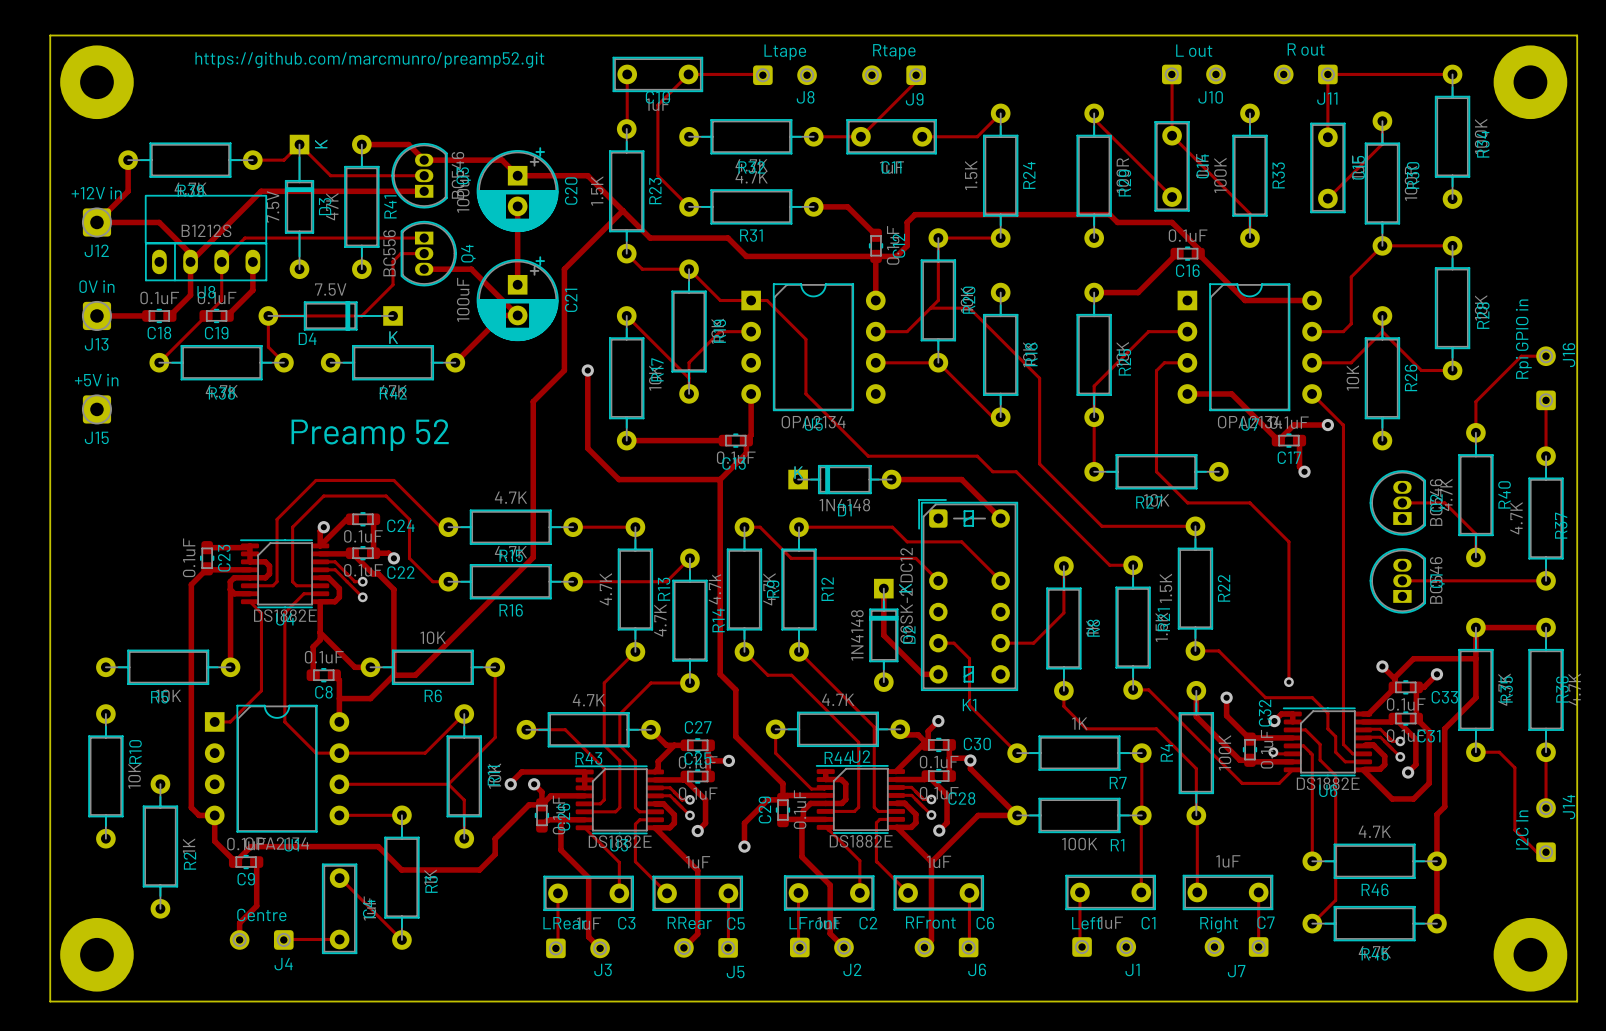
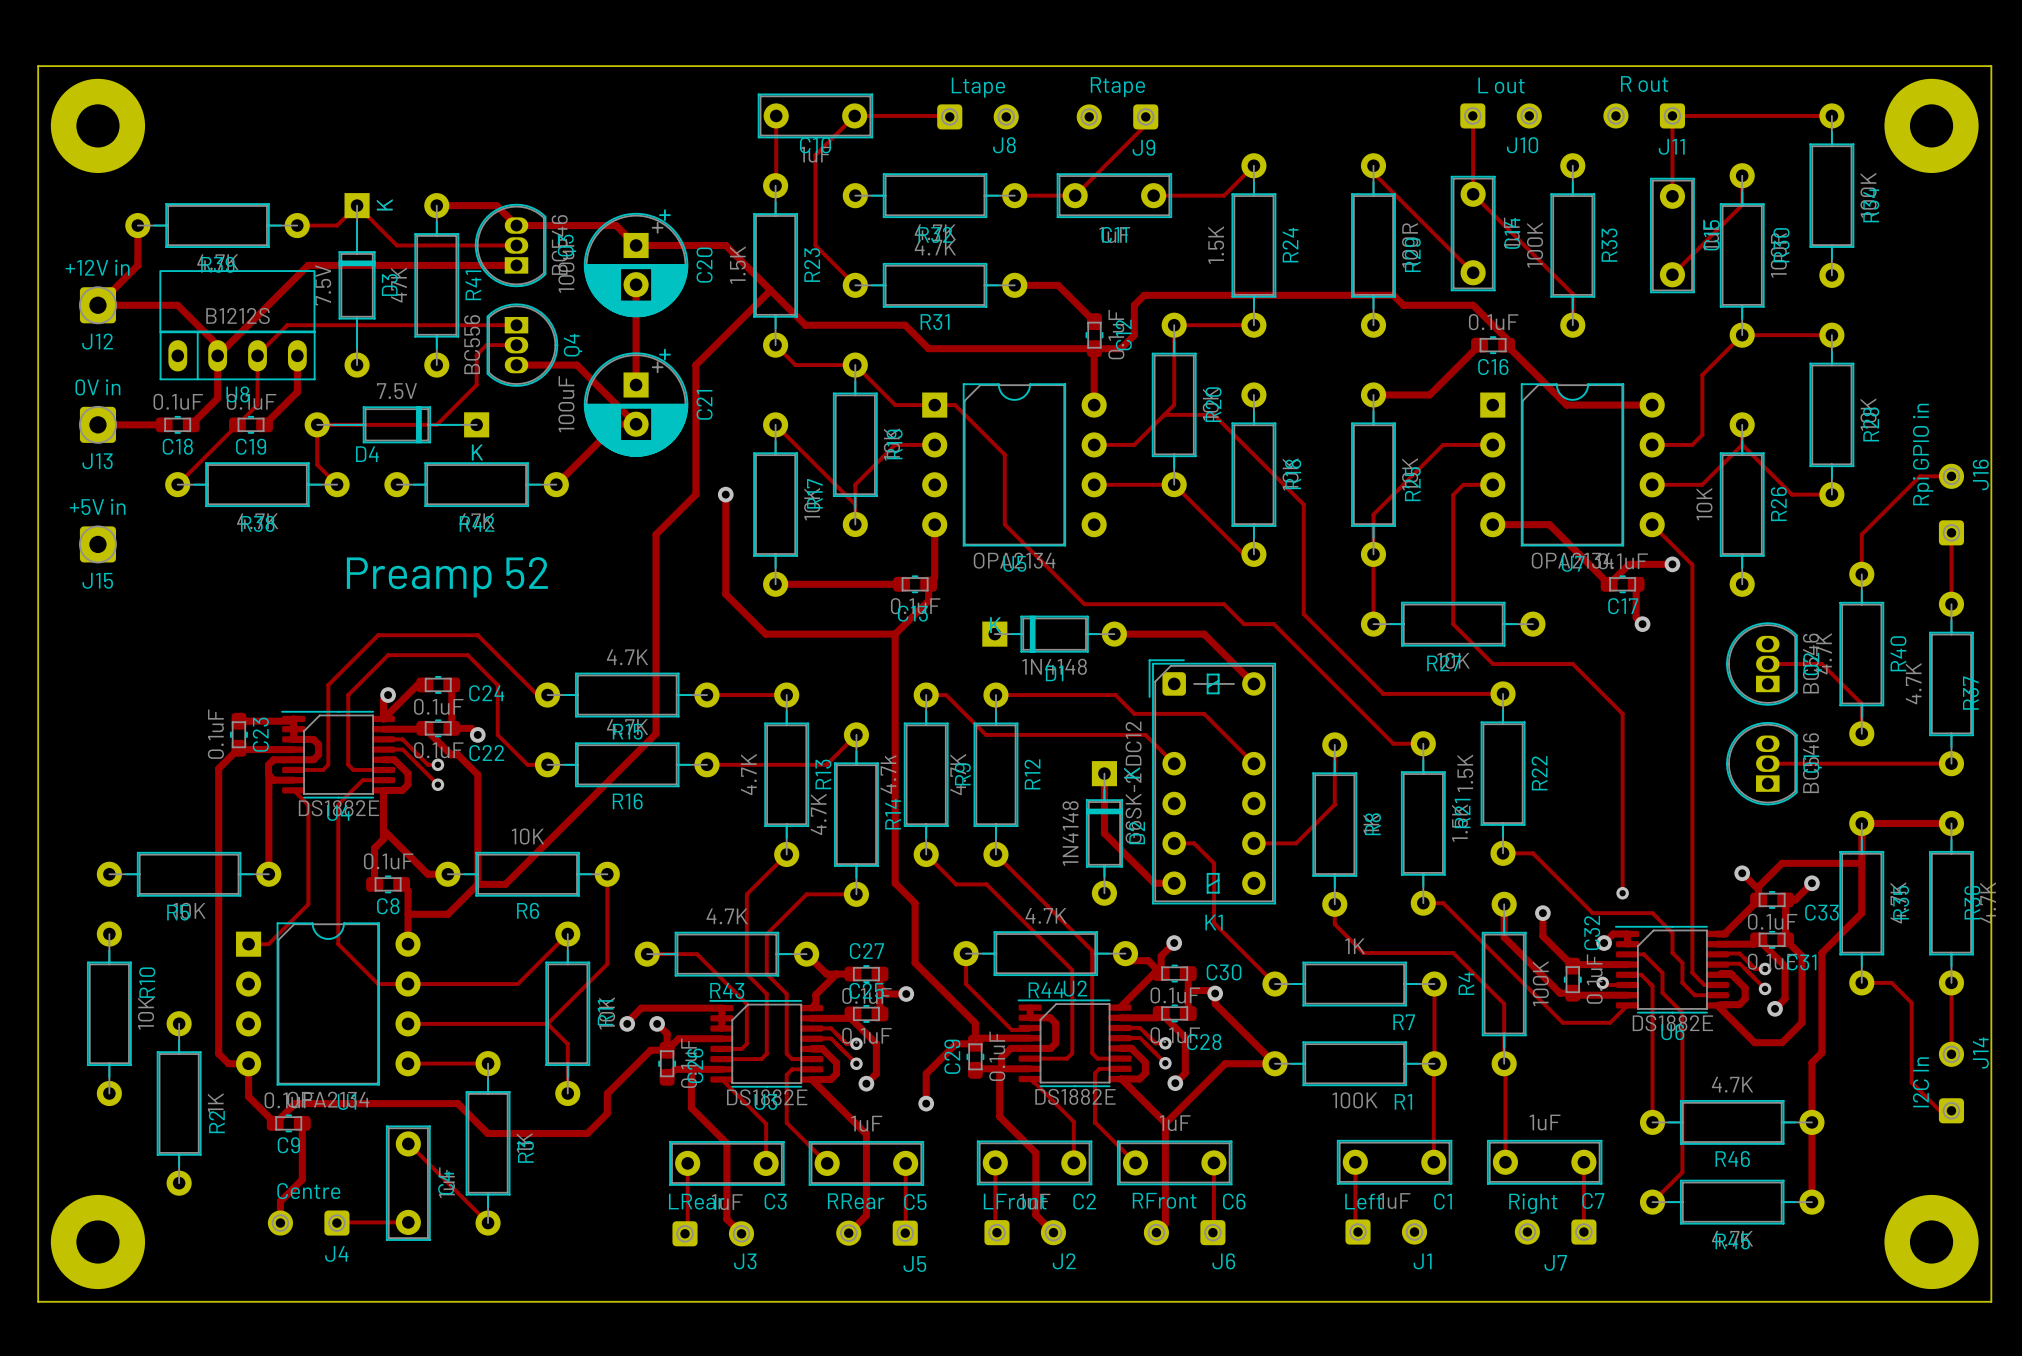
text: https://github.com/marcmunro/preamp52.git (369, 60) -> none

